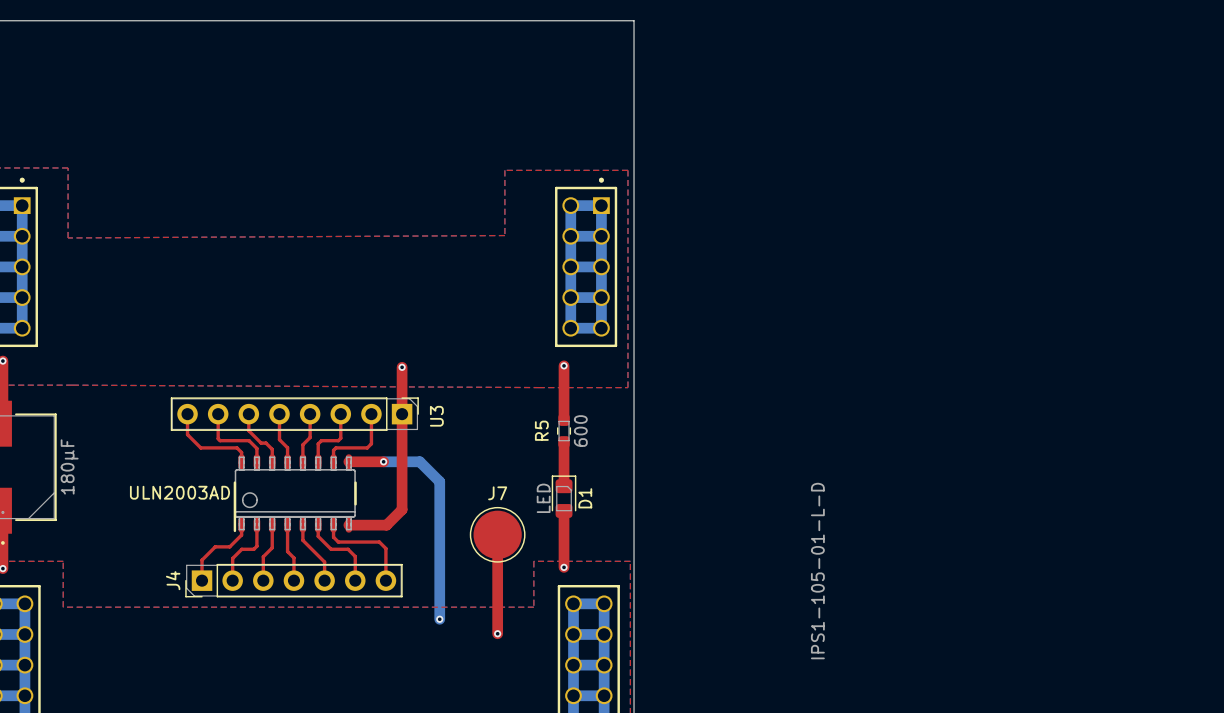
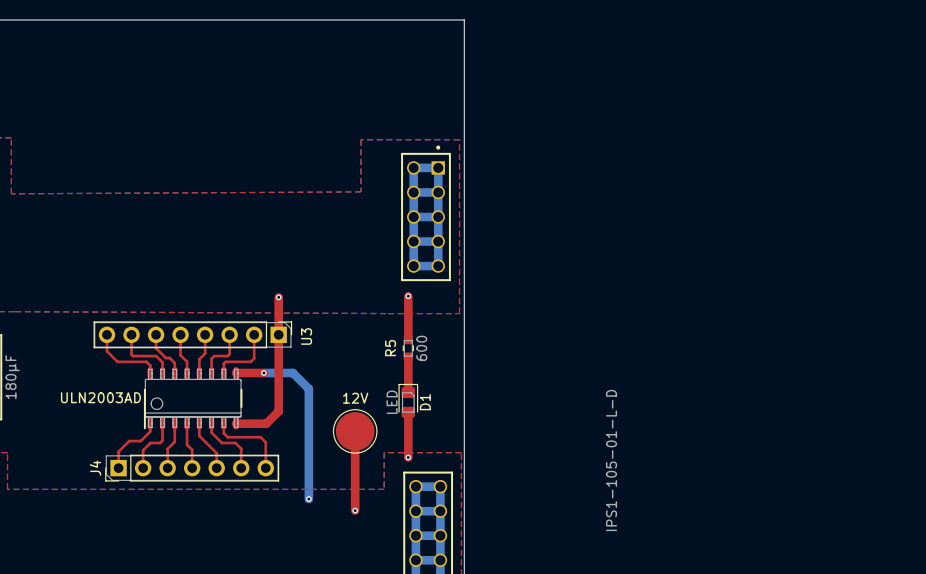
J7 name: J7 (497, 493) -> 12V (355, 398)

